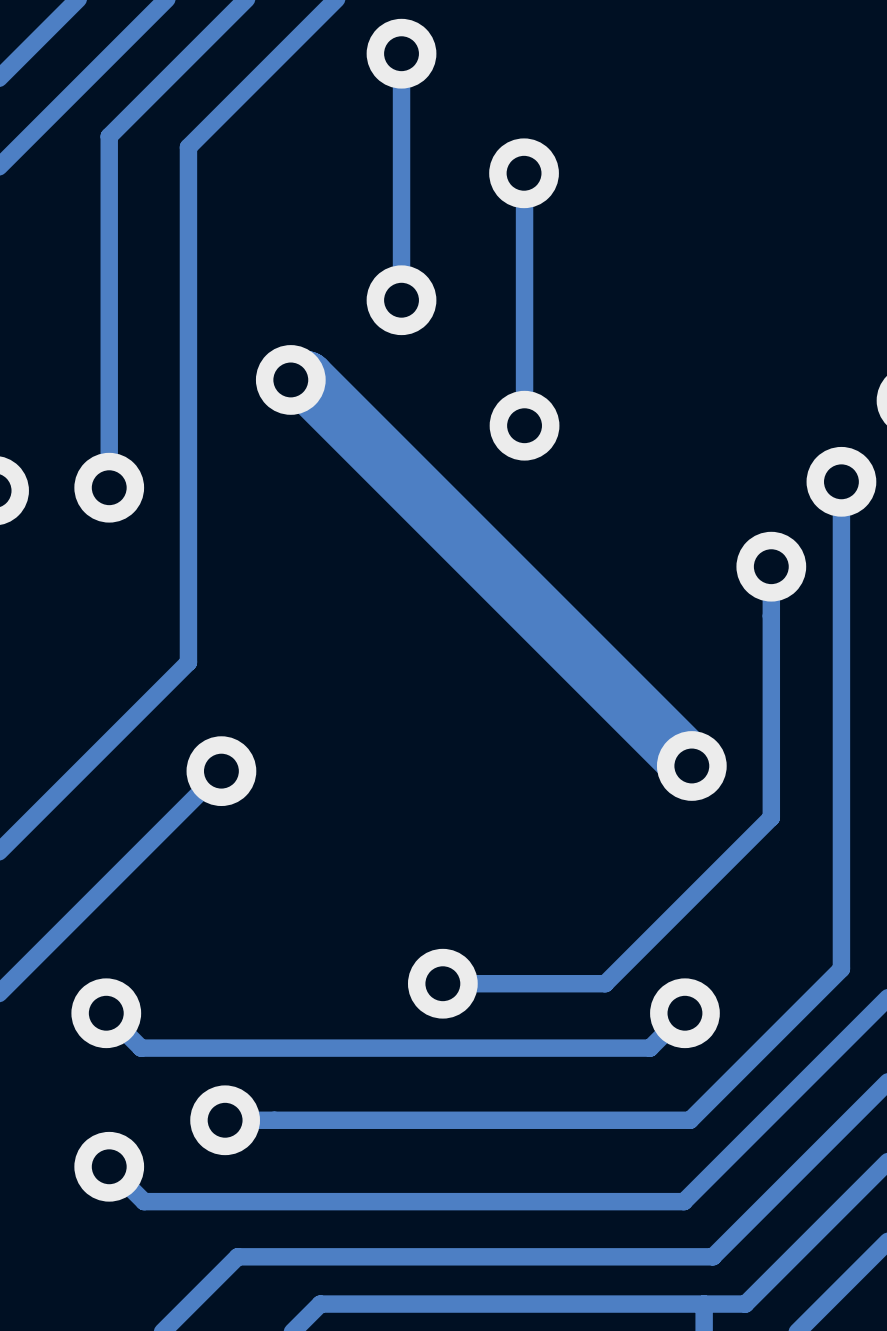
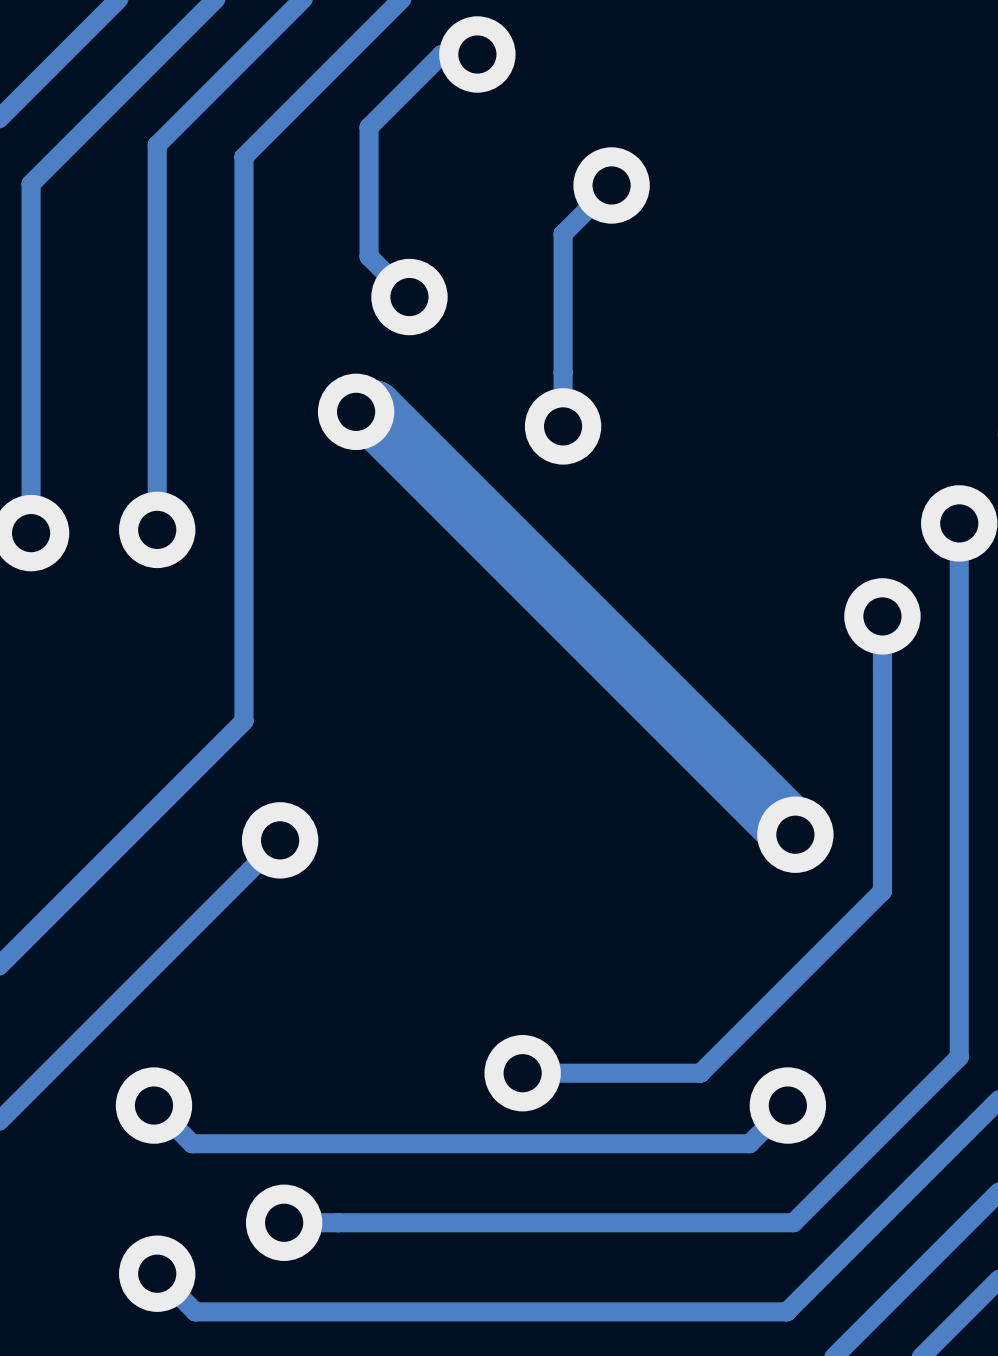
track: (401, 53) (401, 300) -> (477, 54) (441, 54) (369, 127) (369, 256) (409, 297)
track: (524, 173) (524, 425) -> (611, 185) (563, 233) (563, 426)
via: none -> (409, 297)
via: (401, 300) -> none
via position: (524, 425) -> (563, 426)

